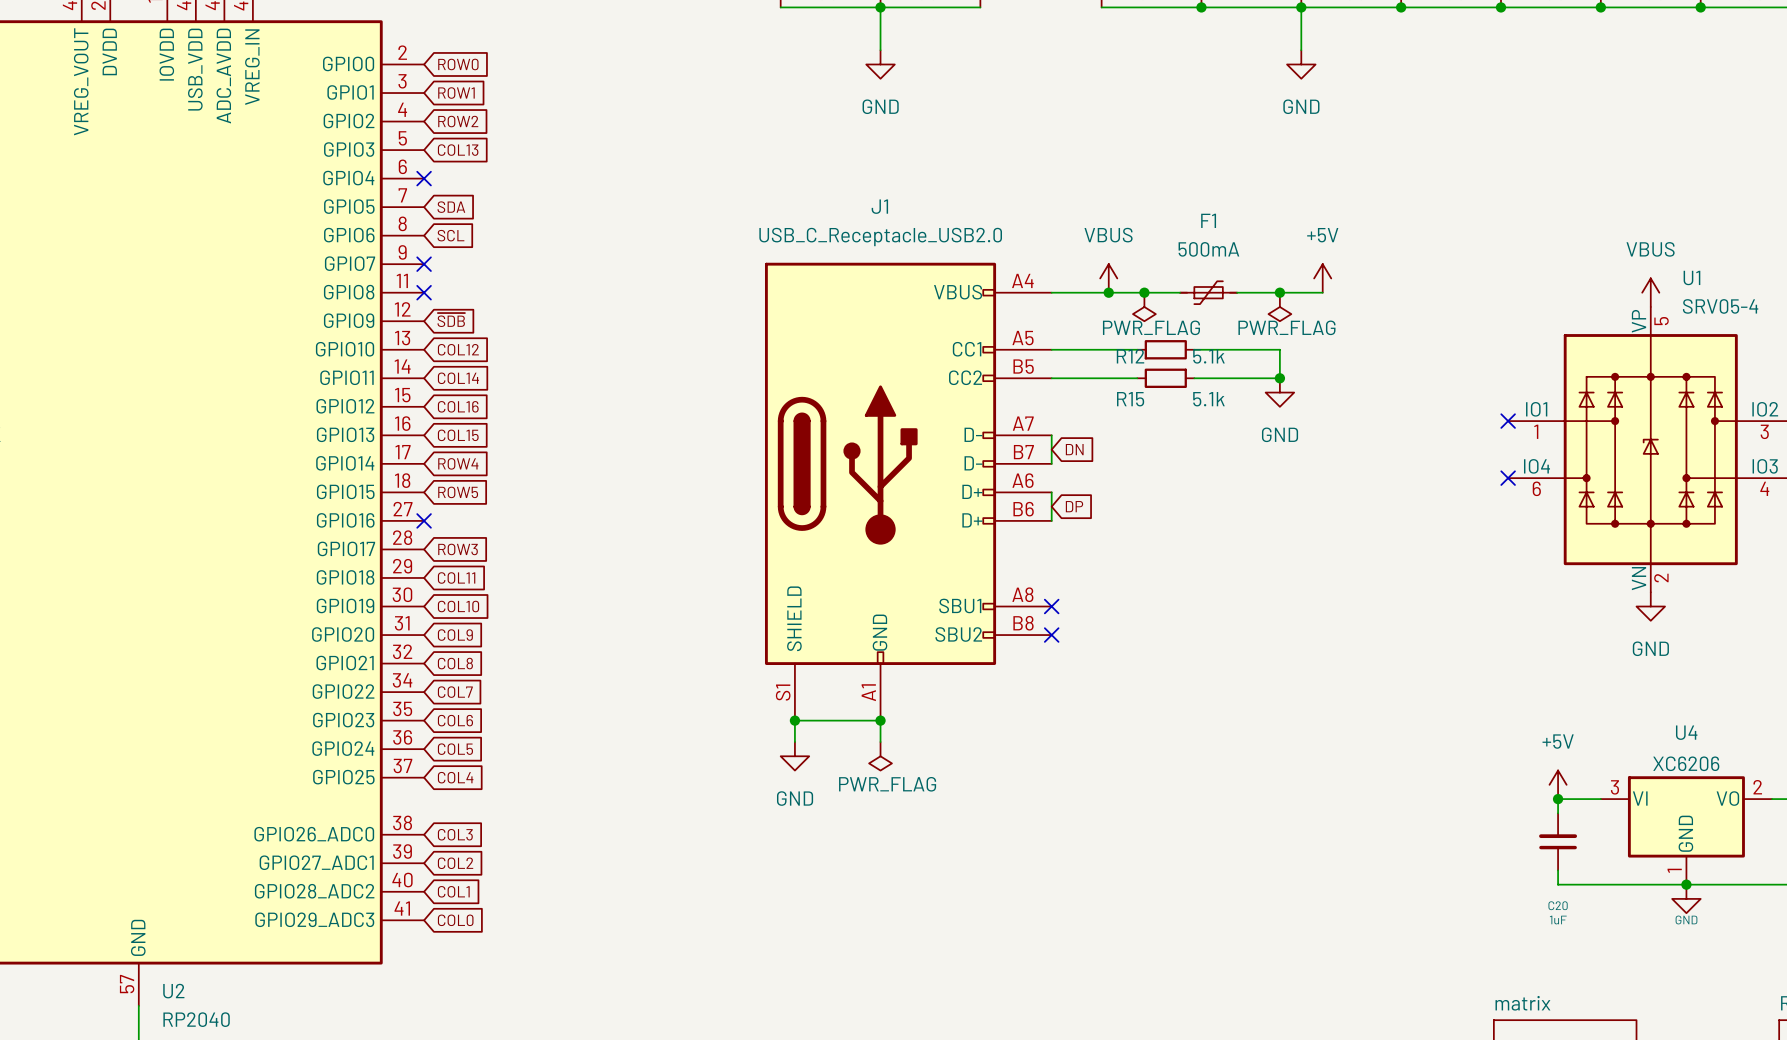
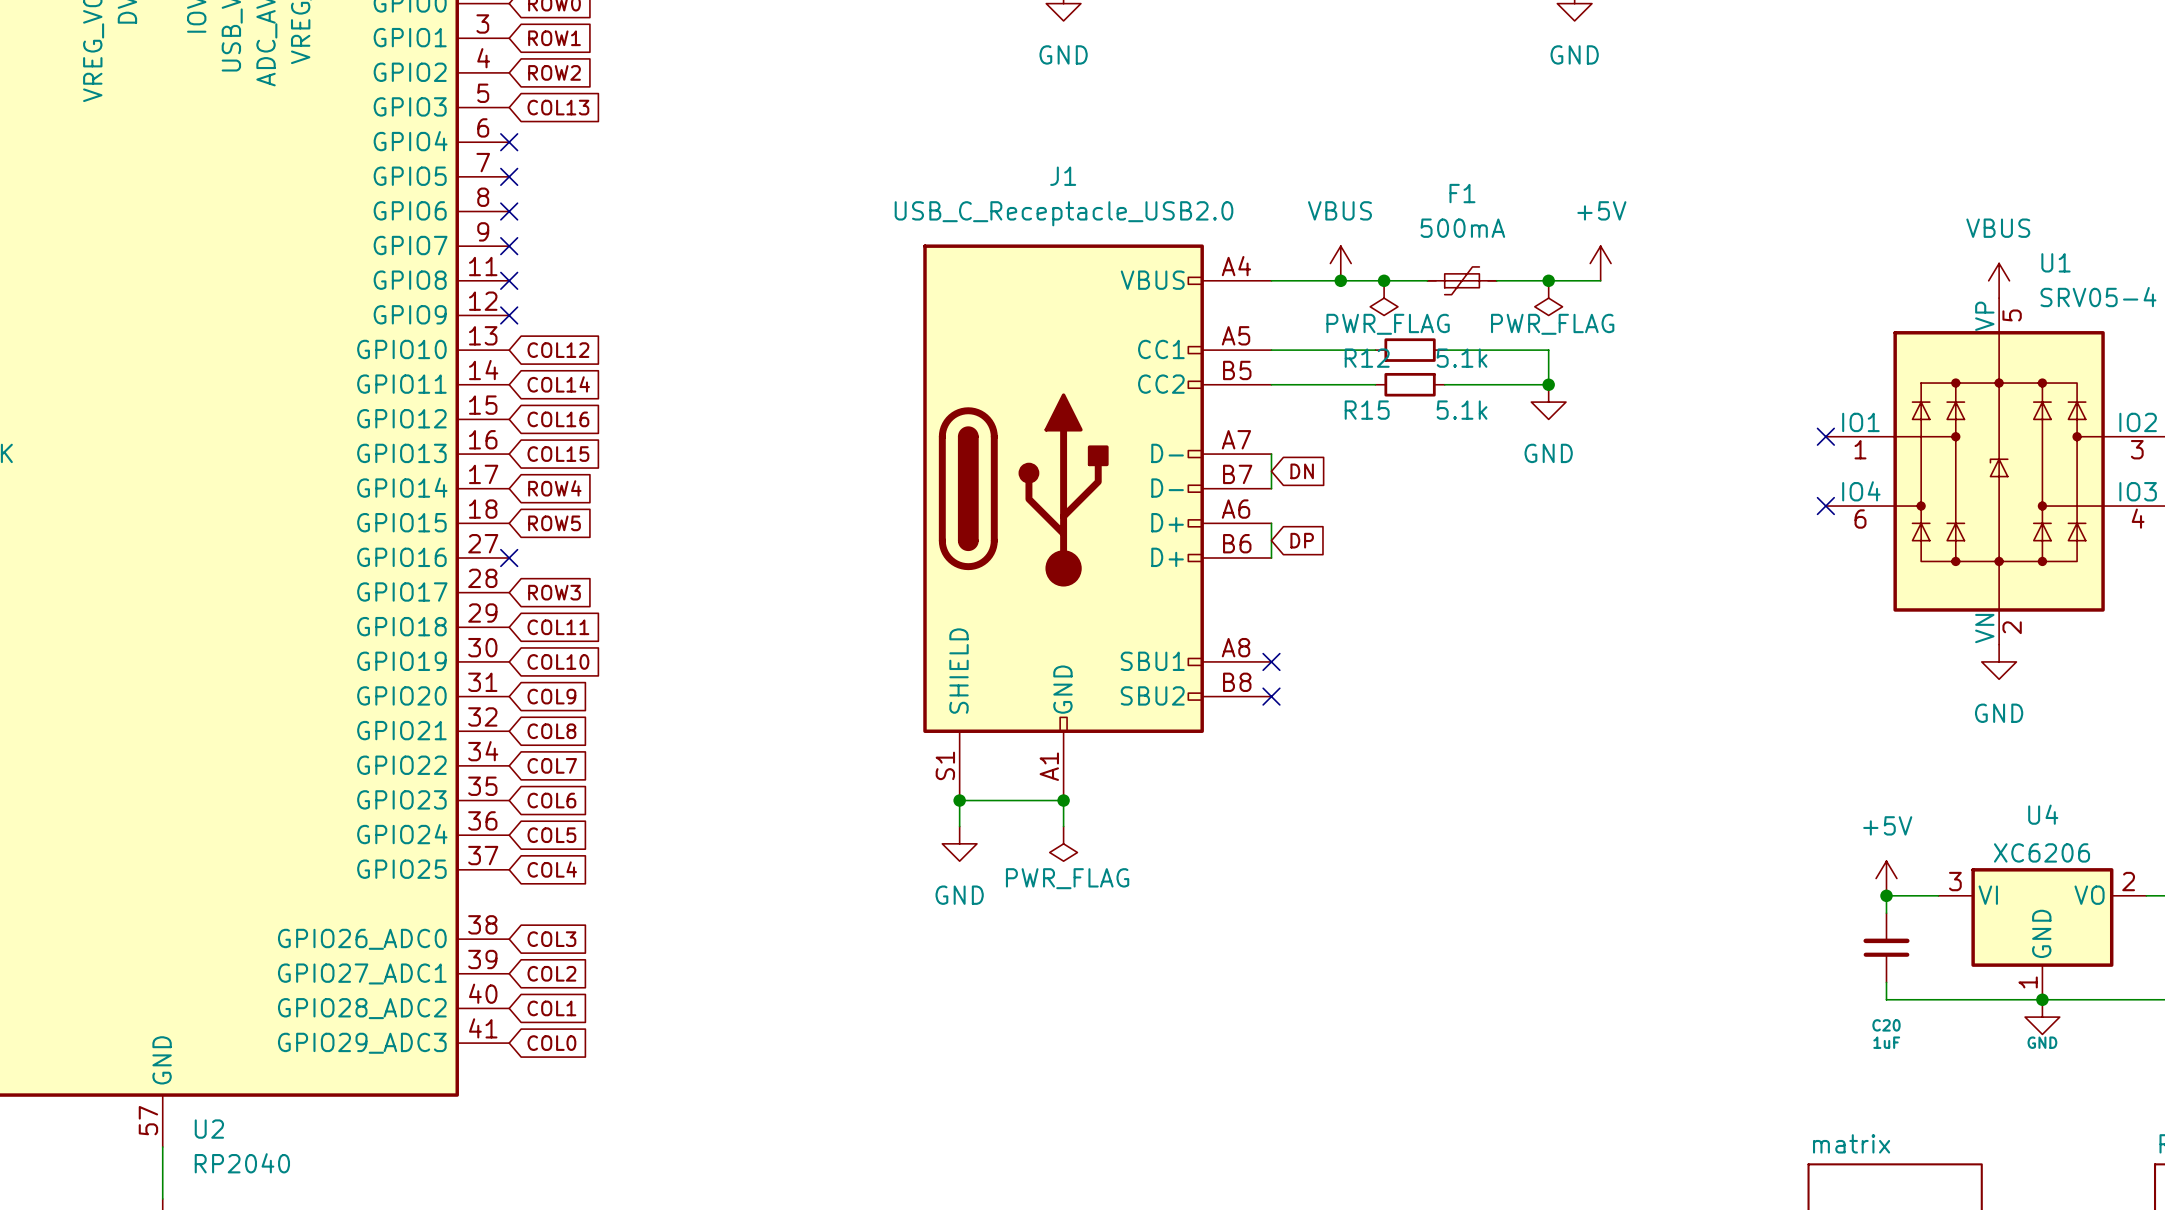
no-connect mark: none -> (509, 176)
global label: SDA (451, 207) -> none
no-connect mark: none -> (509, 211)
global label: SCL (450, 235) -> none
global label: ~{SDB} (451, 320) -> none
no-connect mark: none -> (509, 315)

